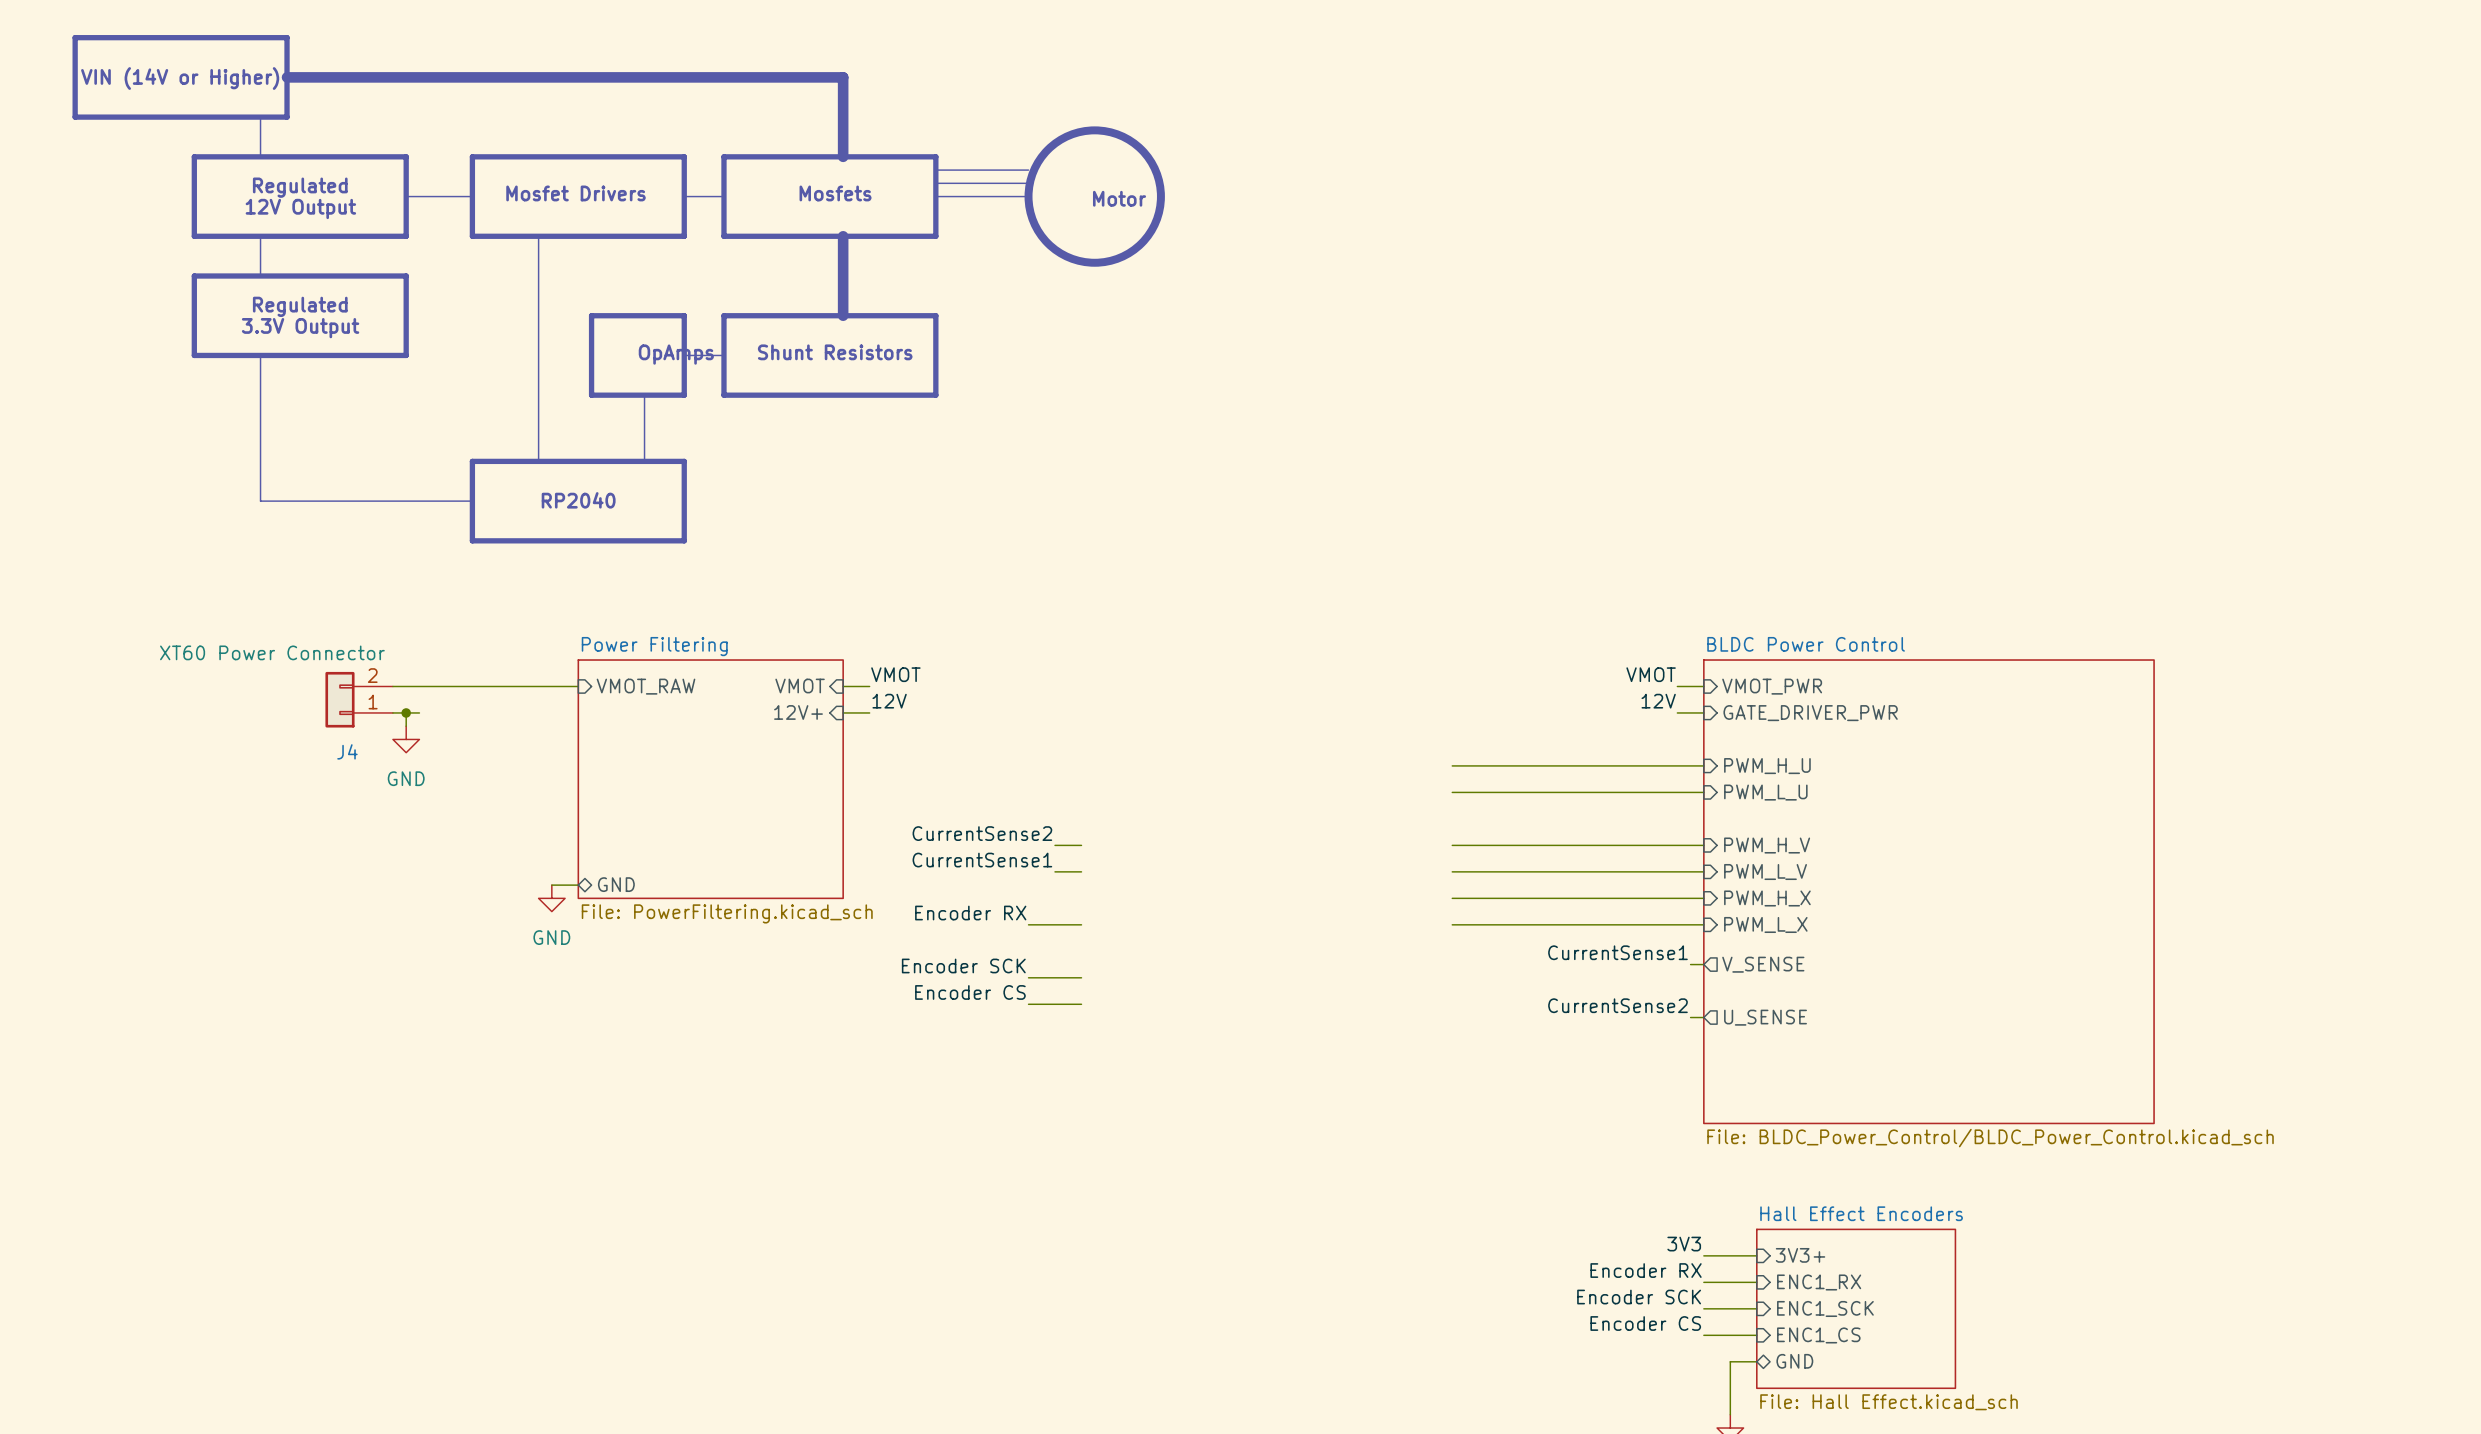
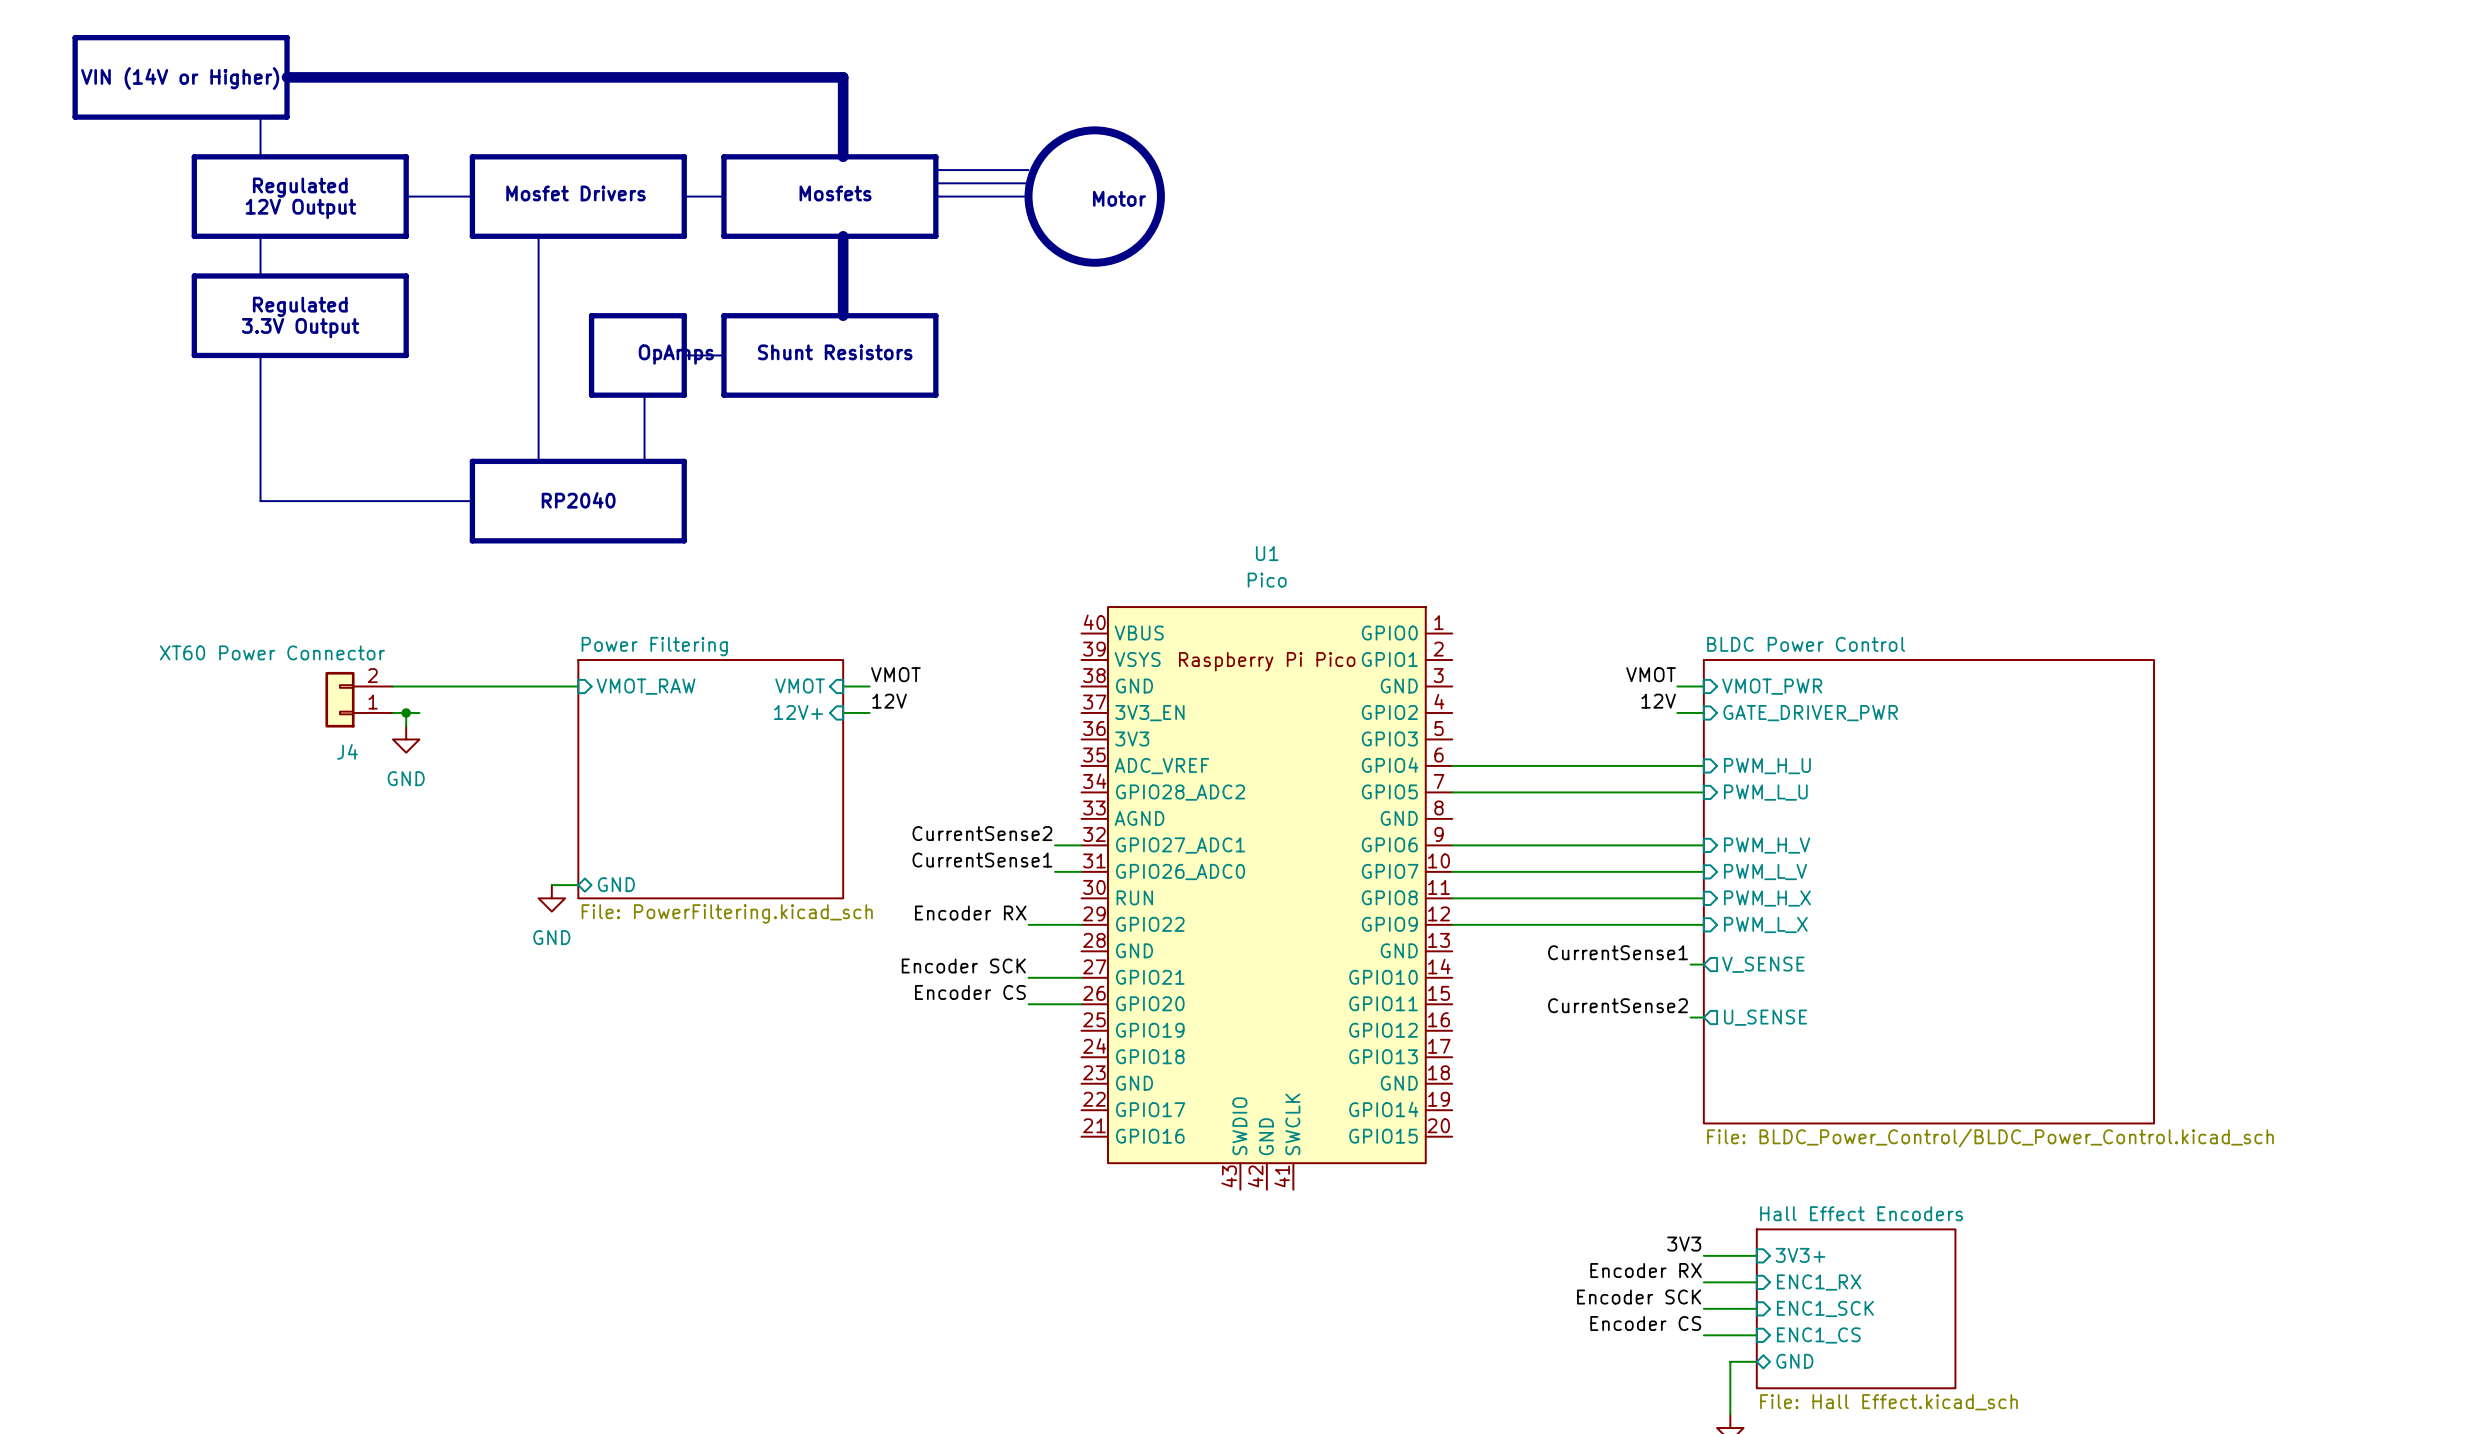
U1: none -> Pico (1266, 898)

